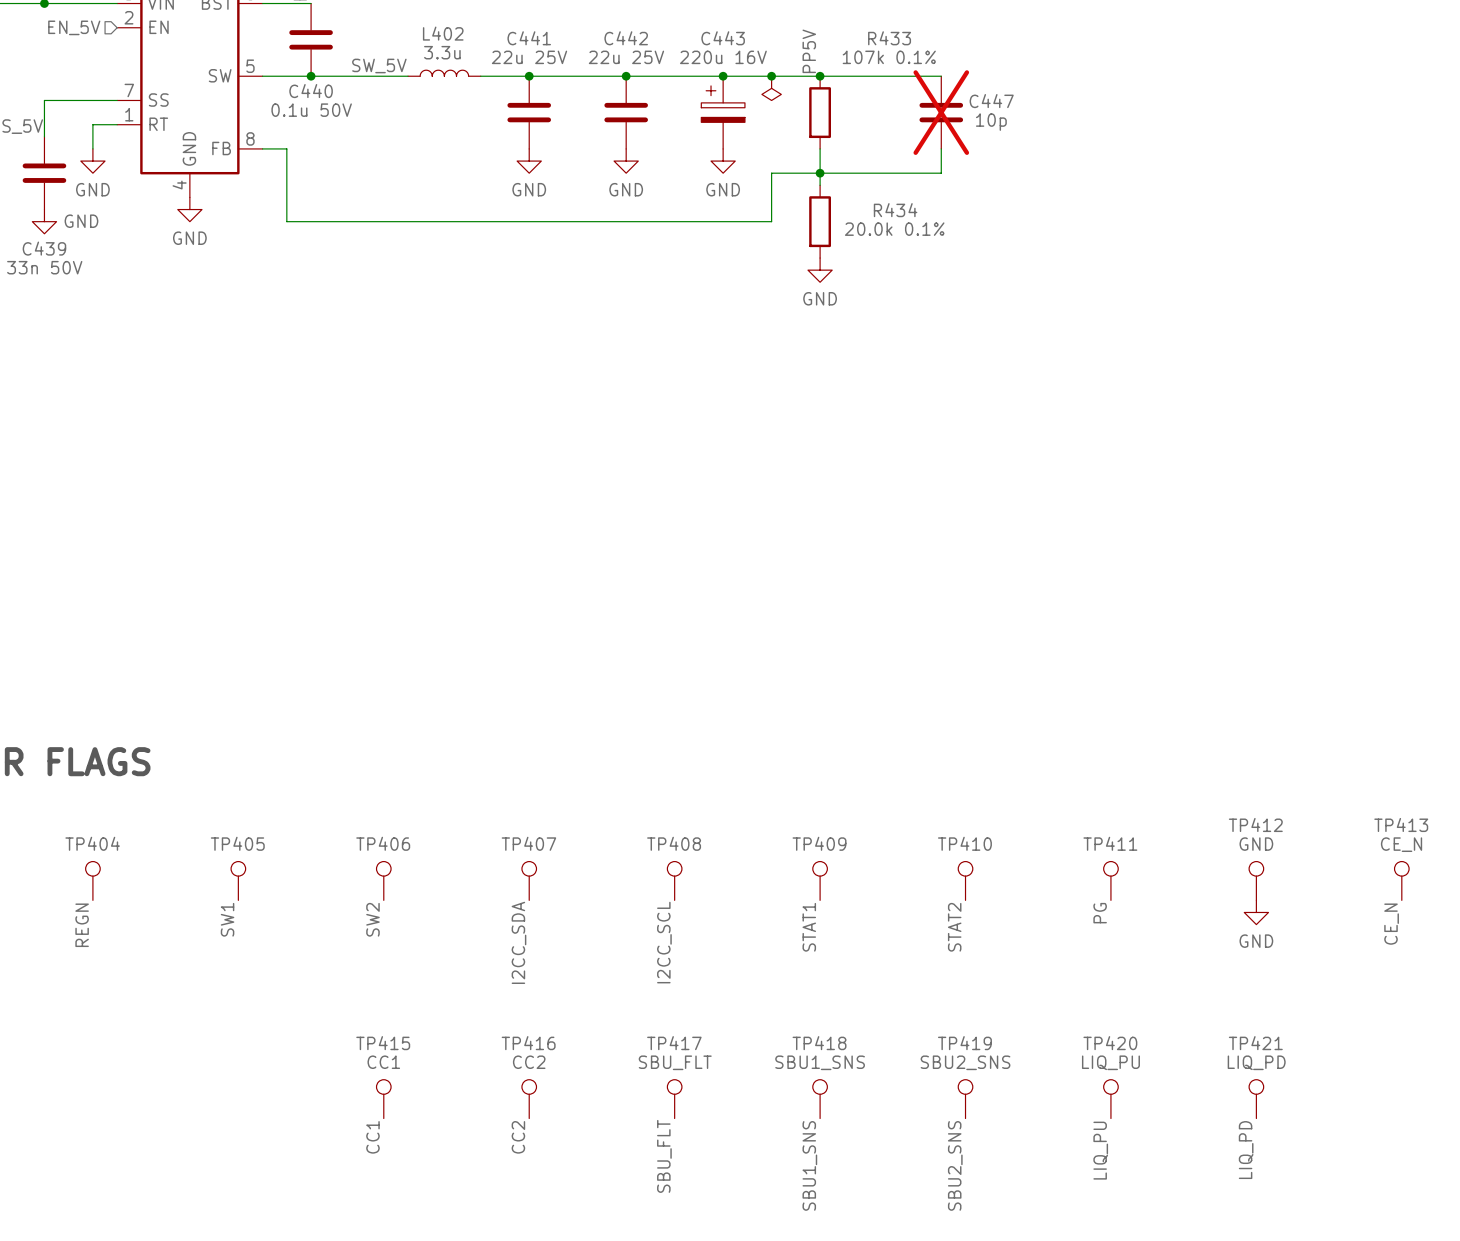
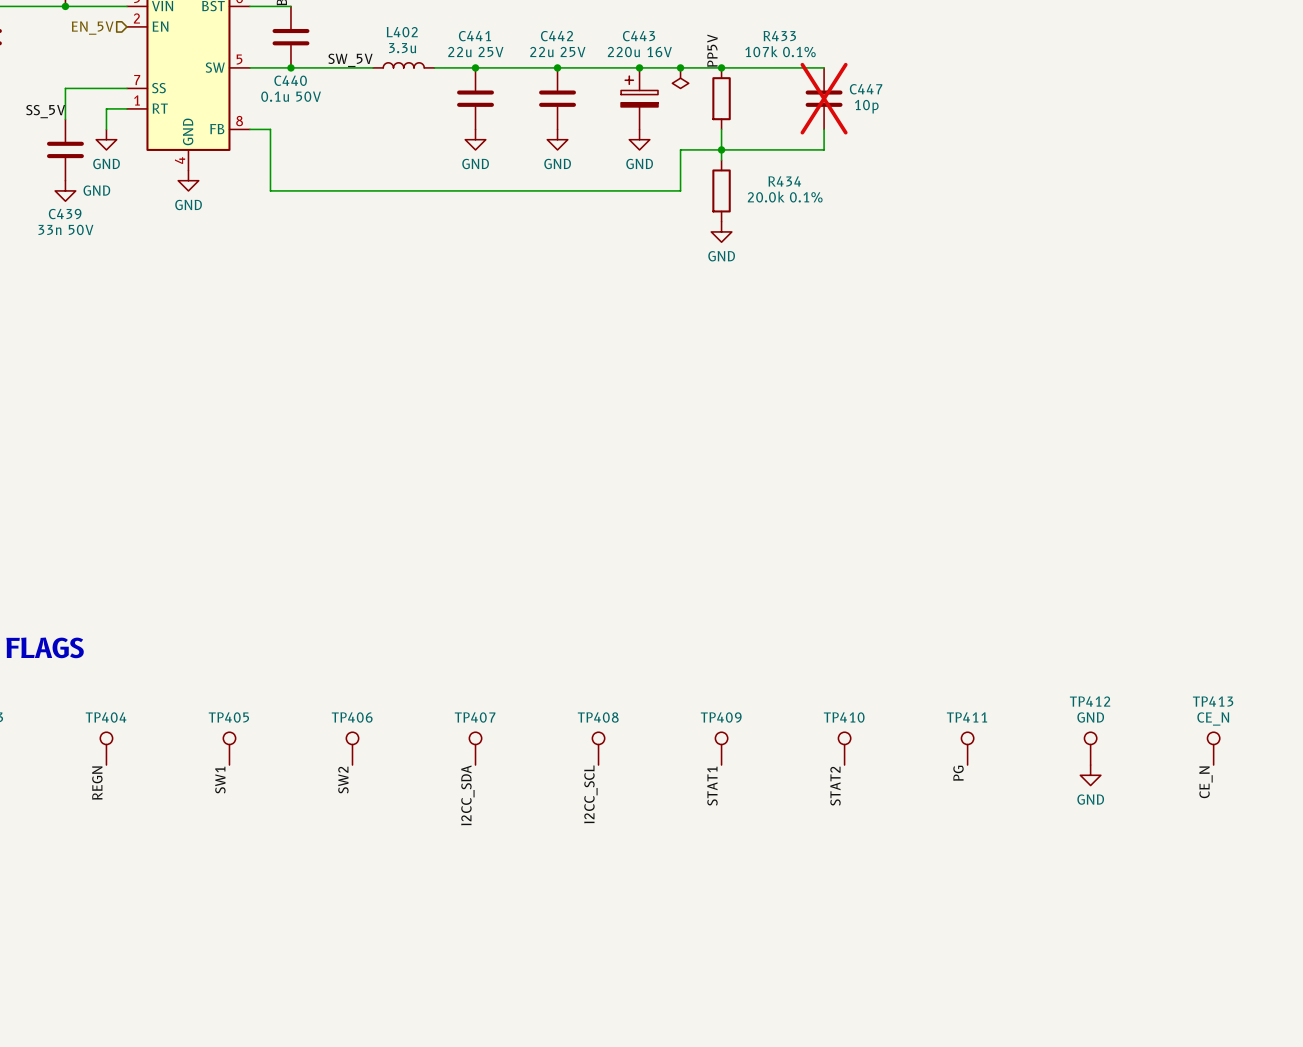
TP415: CC1 (383, 1099) -> none
TP416: CC2 (529, 1099) -> none
TP417: SBU_FLT (674, 1099) -> none
TP418: SBU1_SNS (820, 1099) -> none
TP419: SBU2_SNS (965, 1099) -> none
TP420: LIQ_PU (1110, 1099) -> none
TP421: LIQ_PD (1256, 1099) -> none
label: CC1 (372, 1137) -> none
label: CC2 (518, 1137) -> none
label: LIQ_PU (1100, 1150) -> none
label: LIQ_PD (1246, 1150) -> none
label: SBU_FLT (664, 1156) -> none
label: SBU1_SNS (809, 1165) -> none
label: SBU2_SNS (955, 1165) -> none

